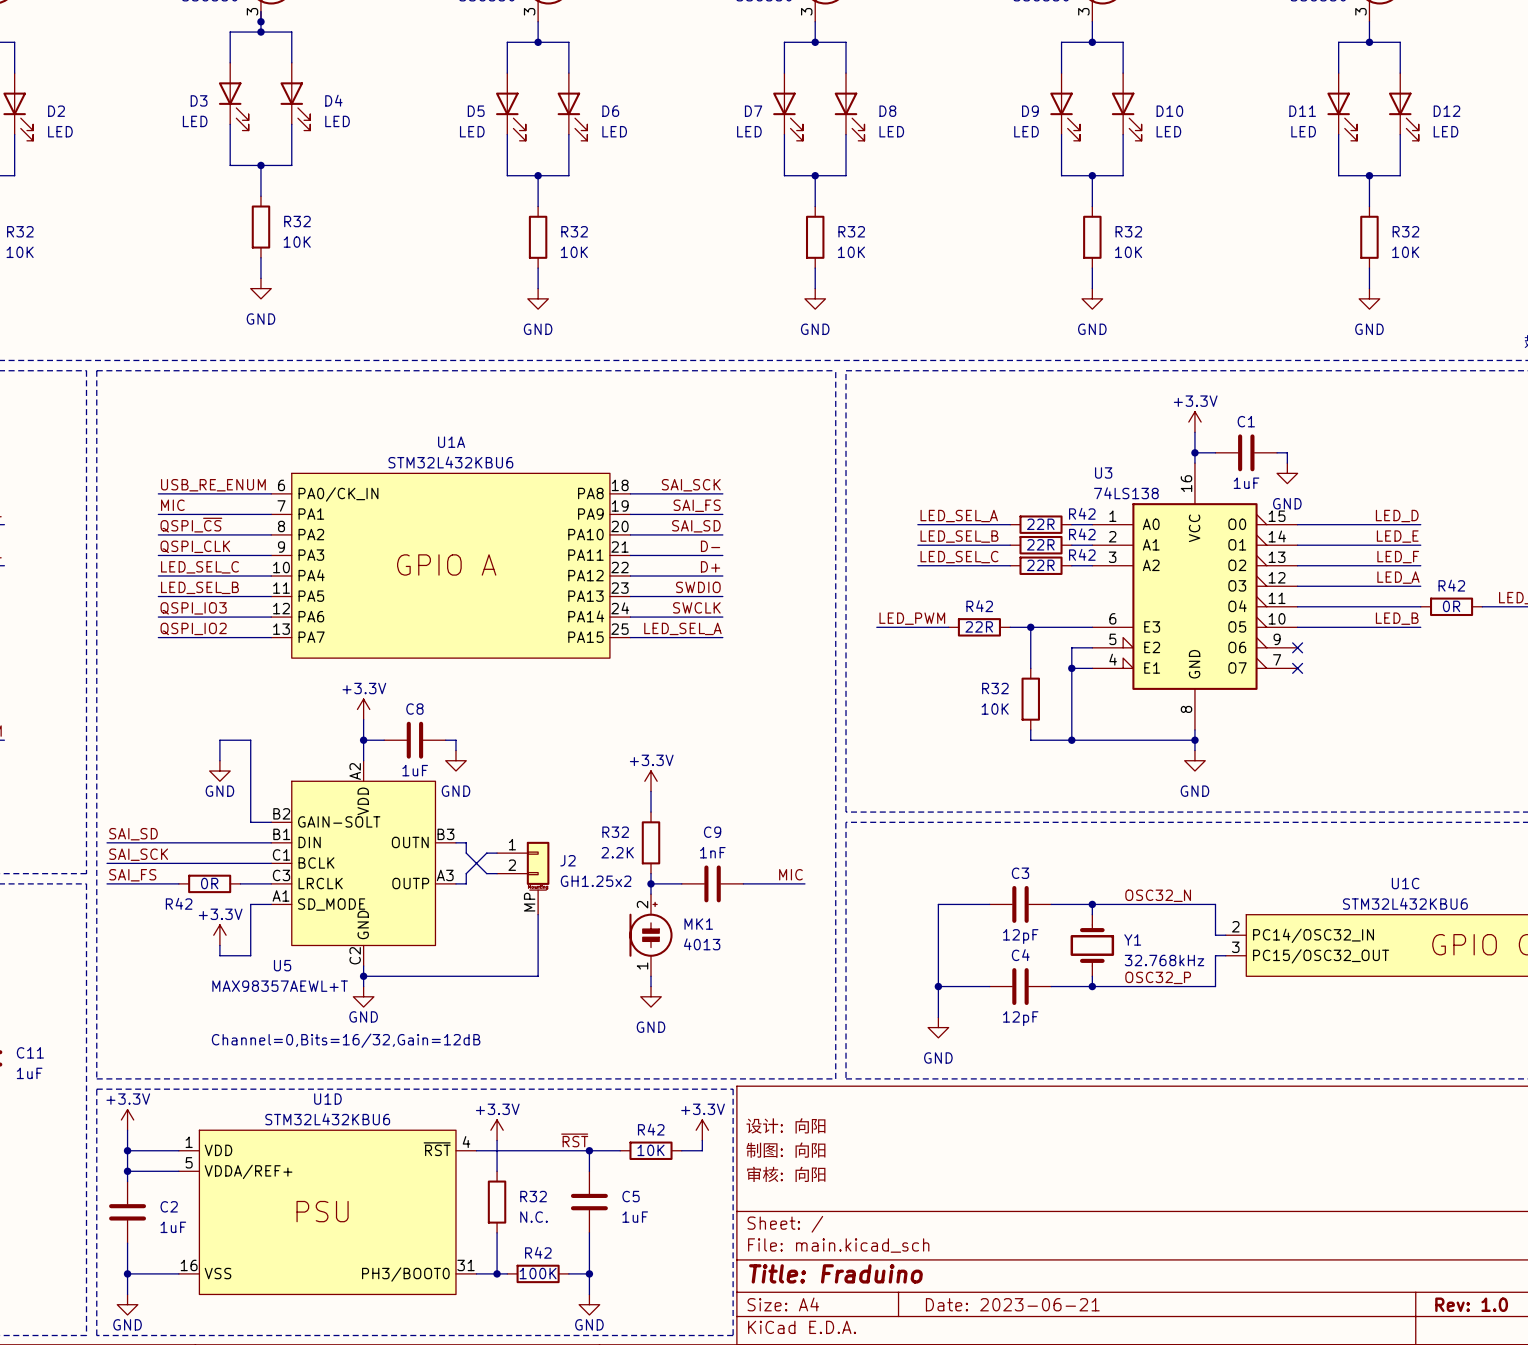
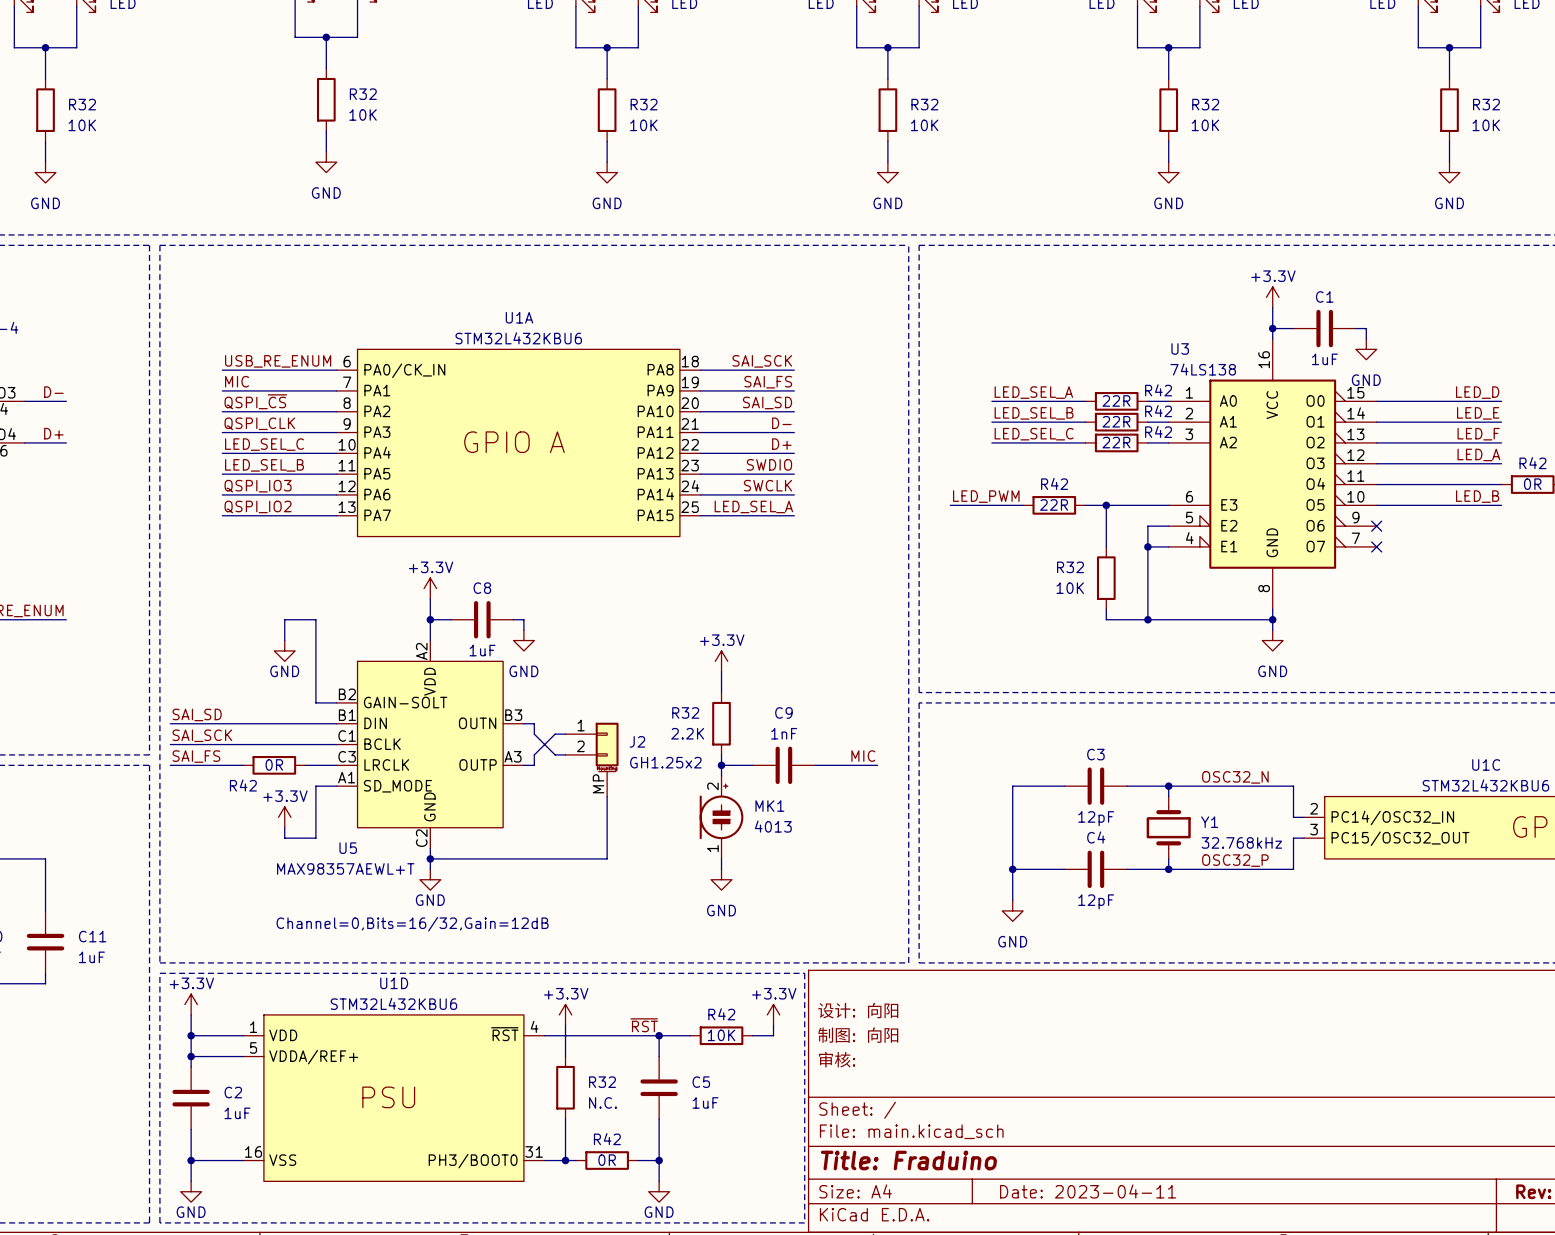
title block: 审核: 向阳 (786, 1174) -> 审核: (836, 1059)
R42 value: 100K (538, 1273) -> 0R (607, 1160)
title block: Date: 2023-06-21 (1012, 1304) -> Date: 2023-04-11 (1088, 1191)

